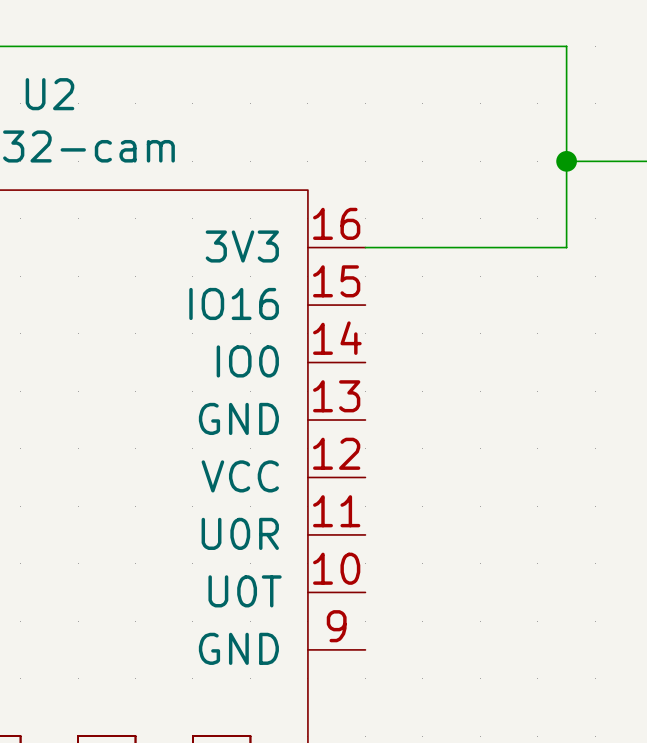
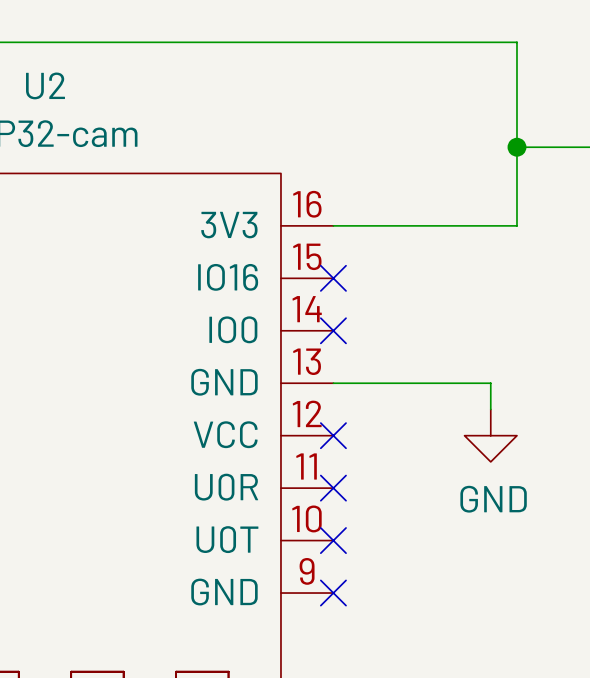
no-connect mark: none -> (333, 278)
no-connect mark: none -> (333, 330)
wire: none -> (333, 383) (490, 383) (490, 409)
no-connect mark: none -> (333, 435)
power symbol: none -> GND (490, 435)
no-connect mark: none -> (333, 488)
no-connect mark: none -> (333, 540)
no-connect mark: none -> (333, 593)

